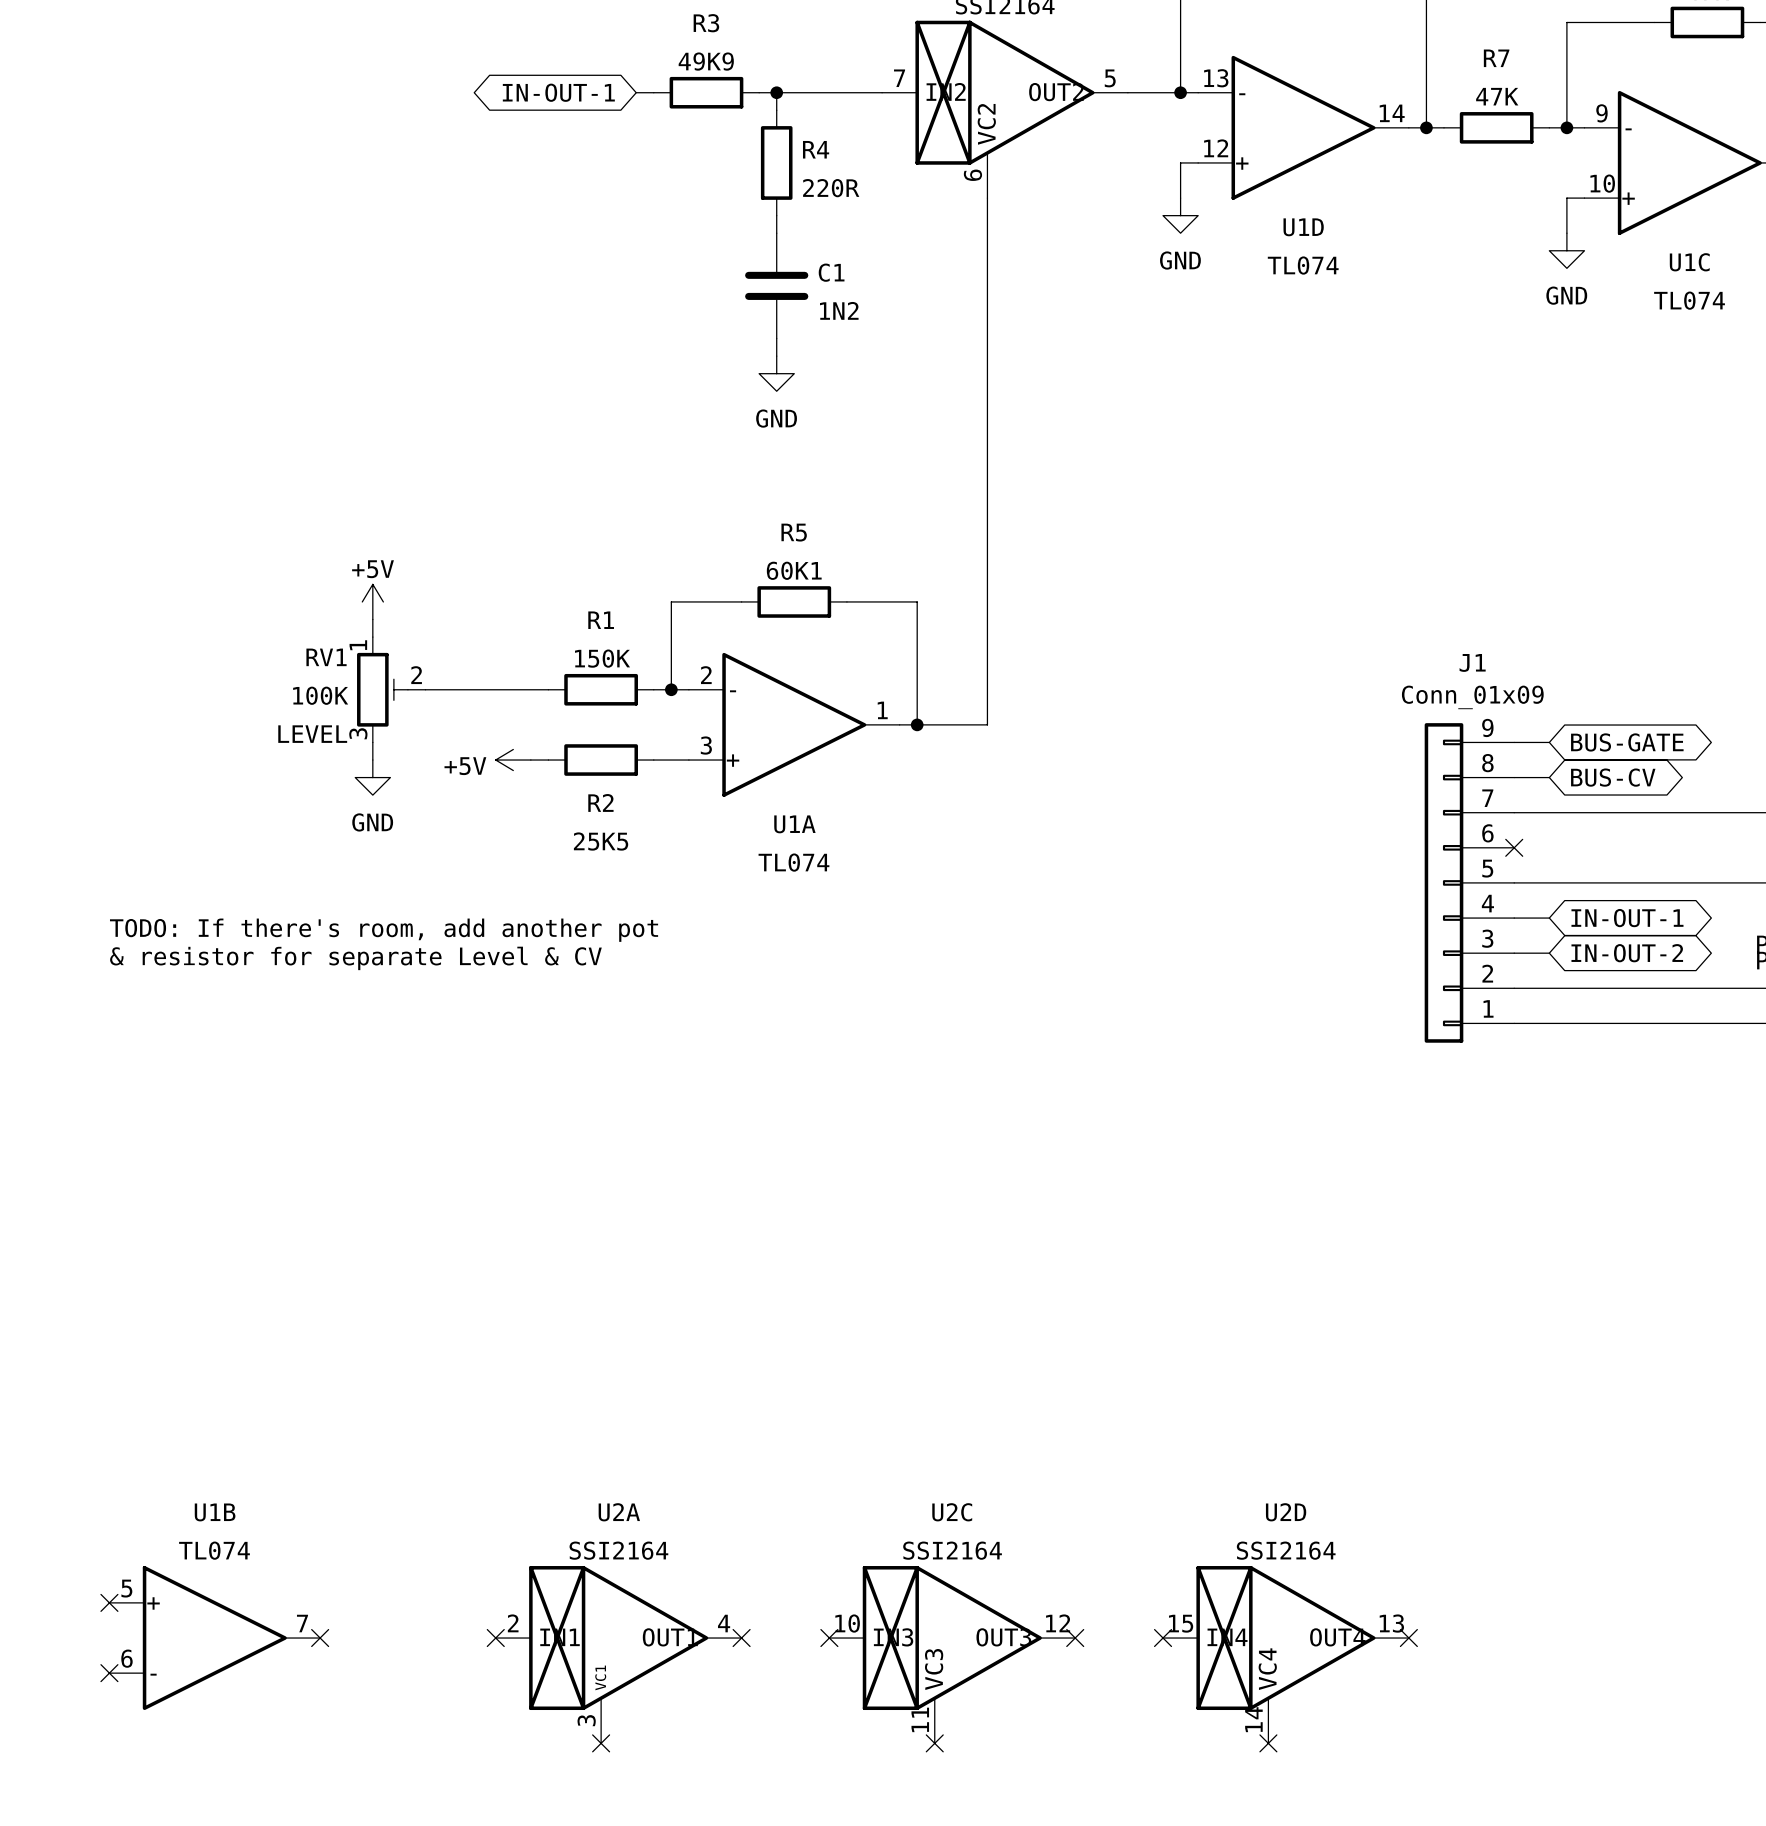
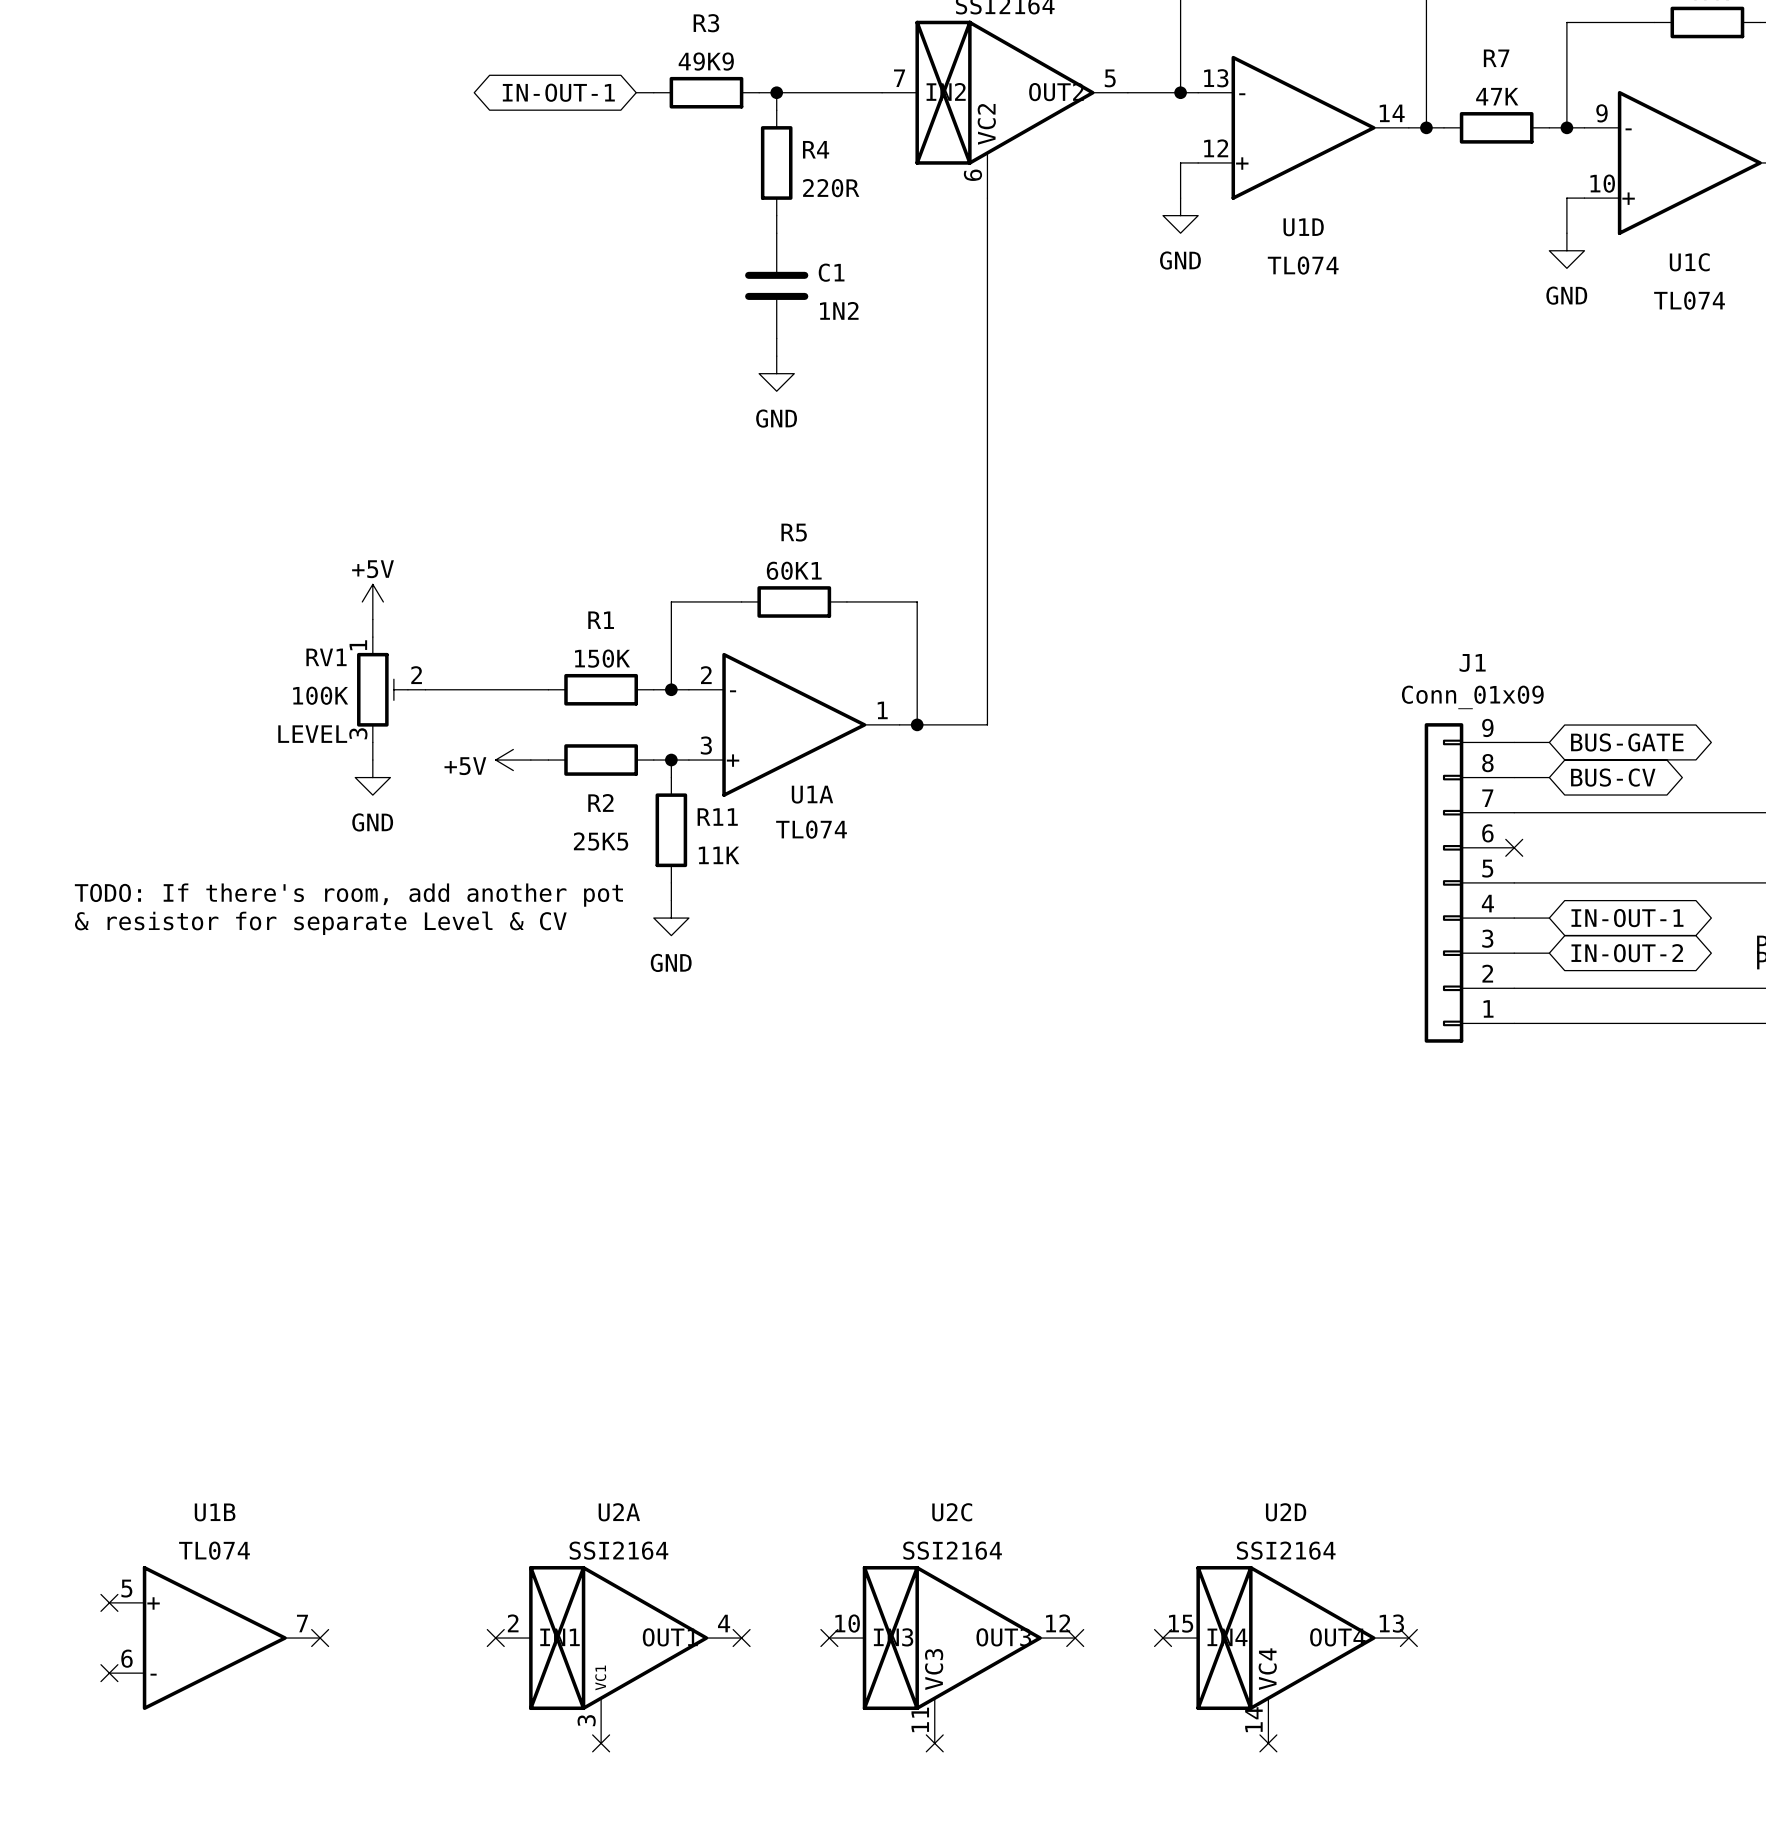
wire: none -> (671, 760) (671, 777)
junction: none -> (671, 760)
U1A name position: U1A (794, 824) -> U1A (812, 794)
R11: none -> 11K (671, 830)
U1A value position: TL074 (793, 862) -> TL074 (811, 829)
wire: none -> (671, 882) (671, 900)
power symbol: none -> GND (671, 918)
text position: TODO: If there's room, add another pot (384, 930) -> TODO: If there's room, add another pot (348, 895)
text position: & resistor for separate Level & CV (355, 958) -> & resistor for separate Level & CV (320, 923)

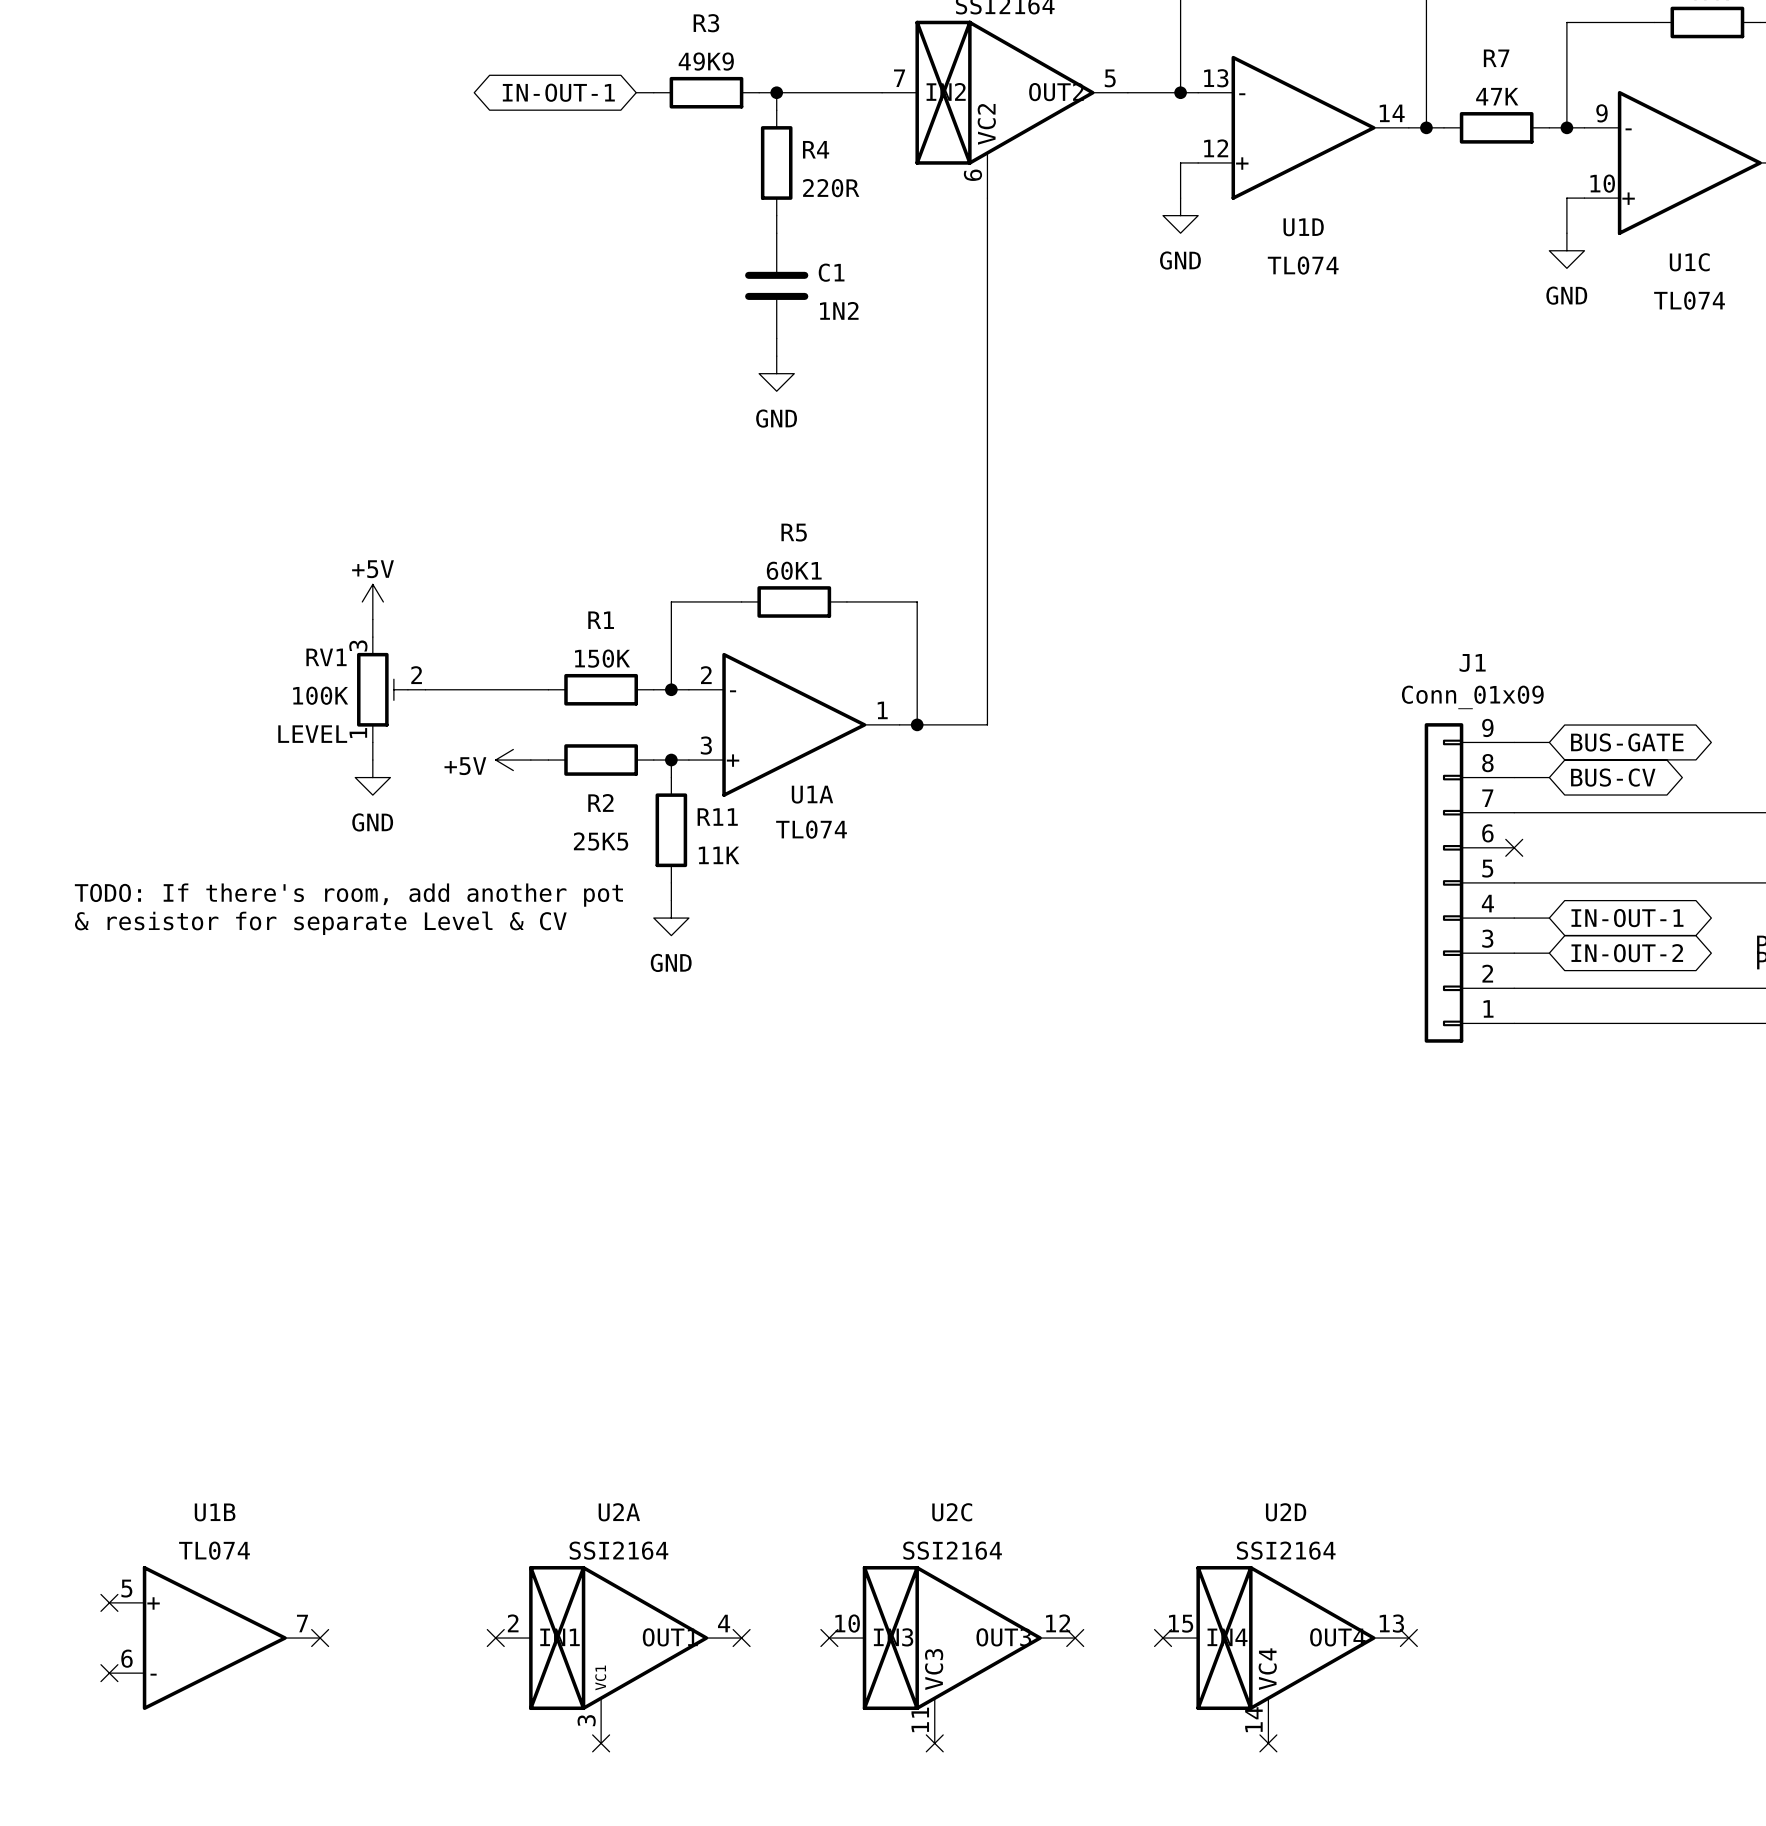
RV1 flip: as is (382, 689) -> up-down (382, 689)

